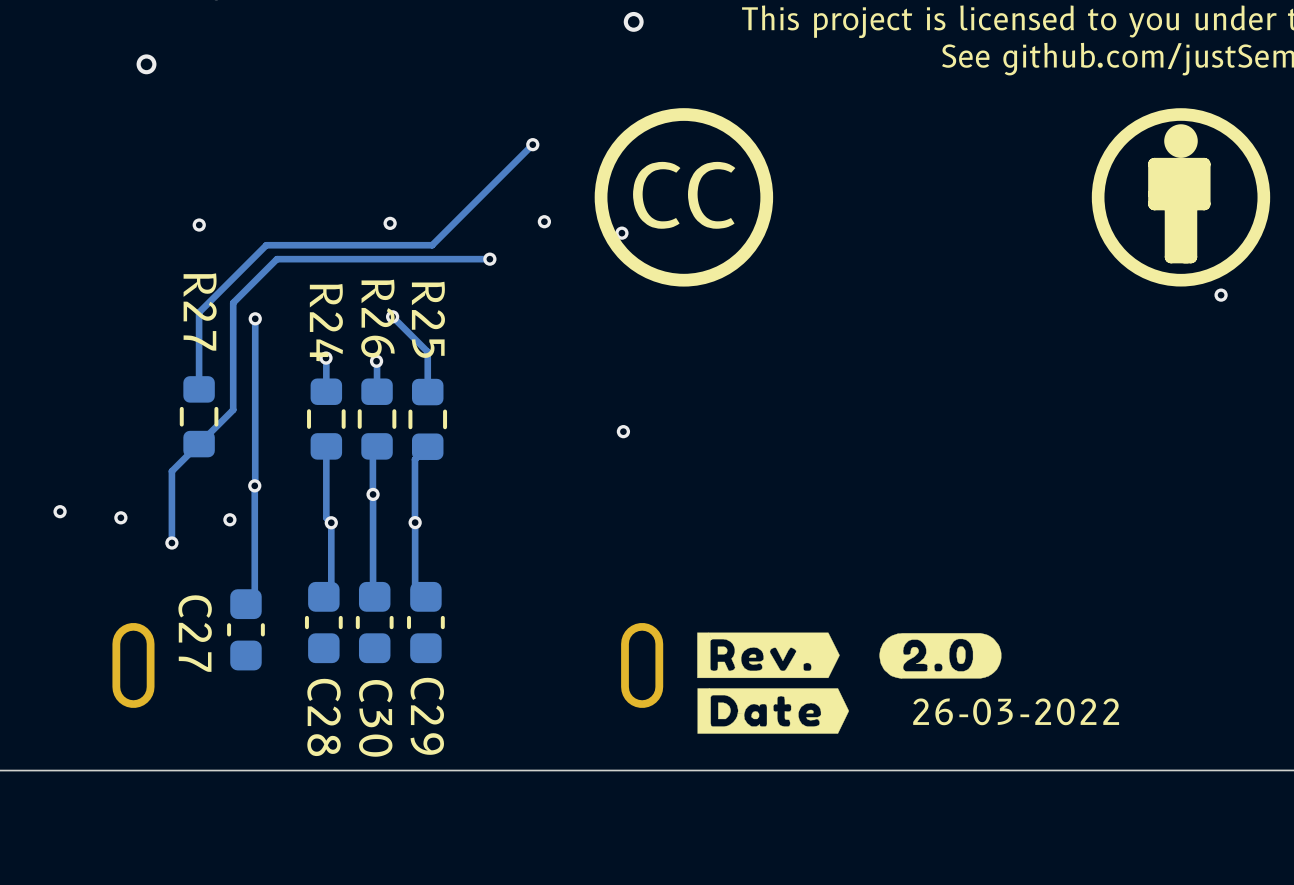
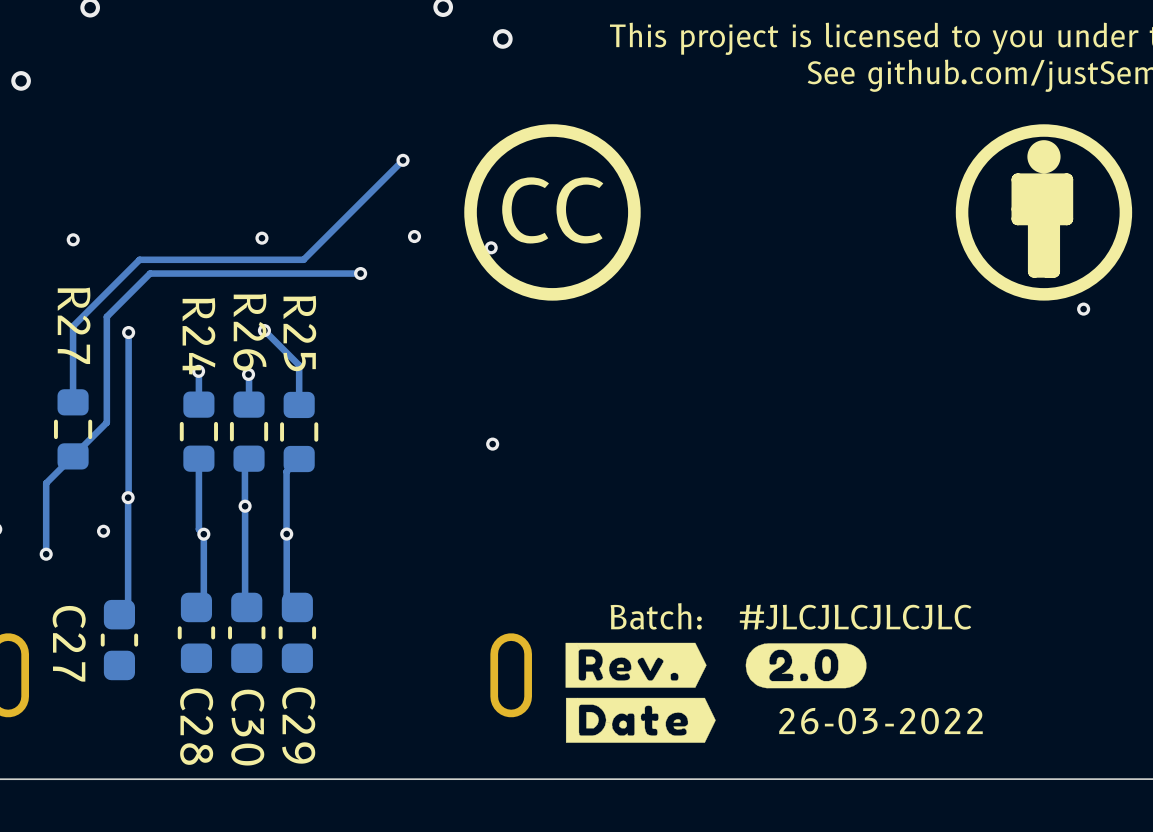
text: none -> Batch: #JLCJLCJLCJLC (791, 616)

